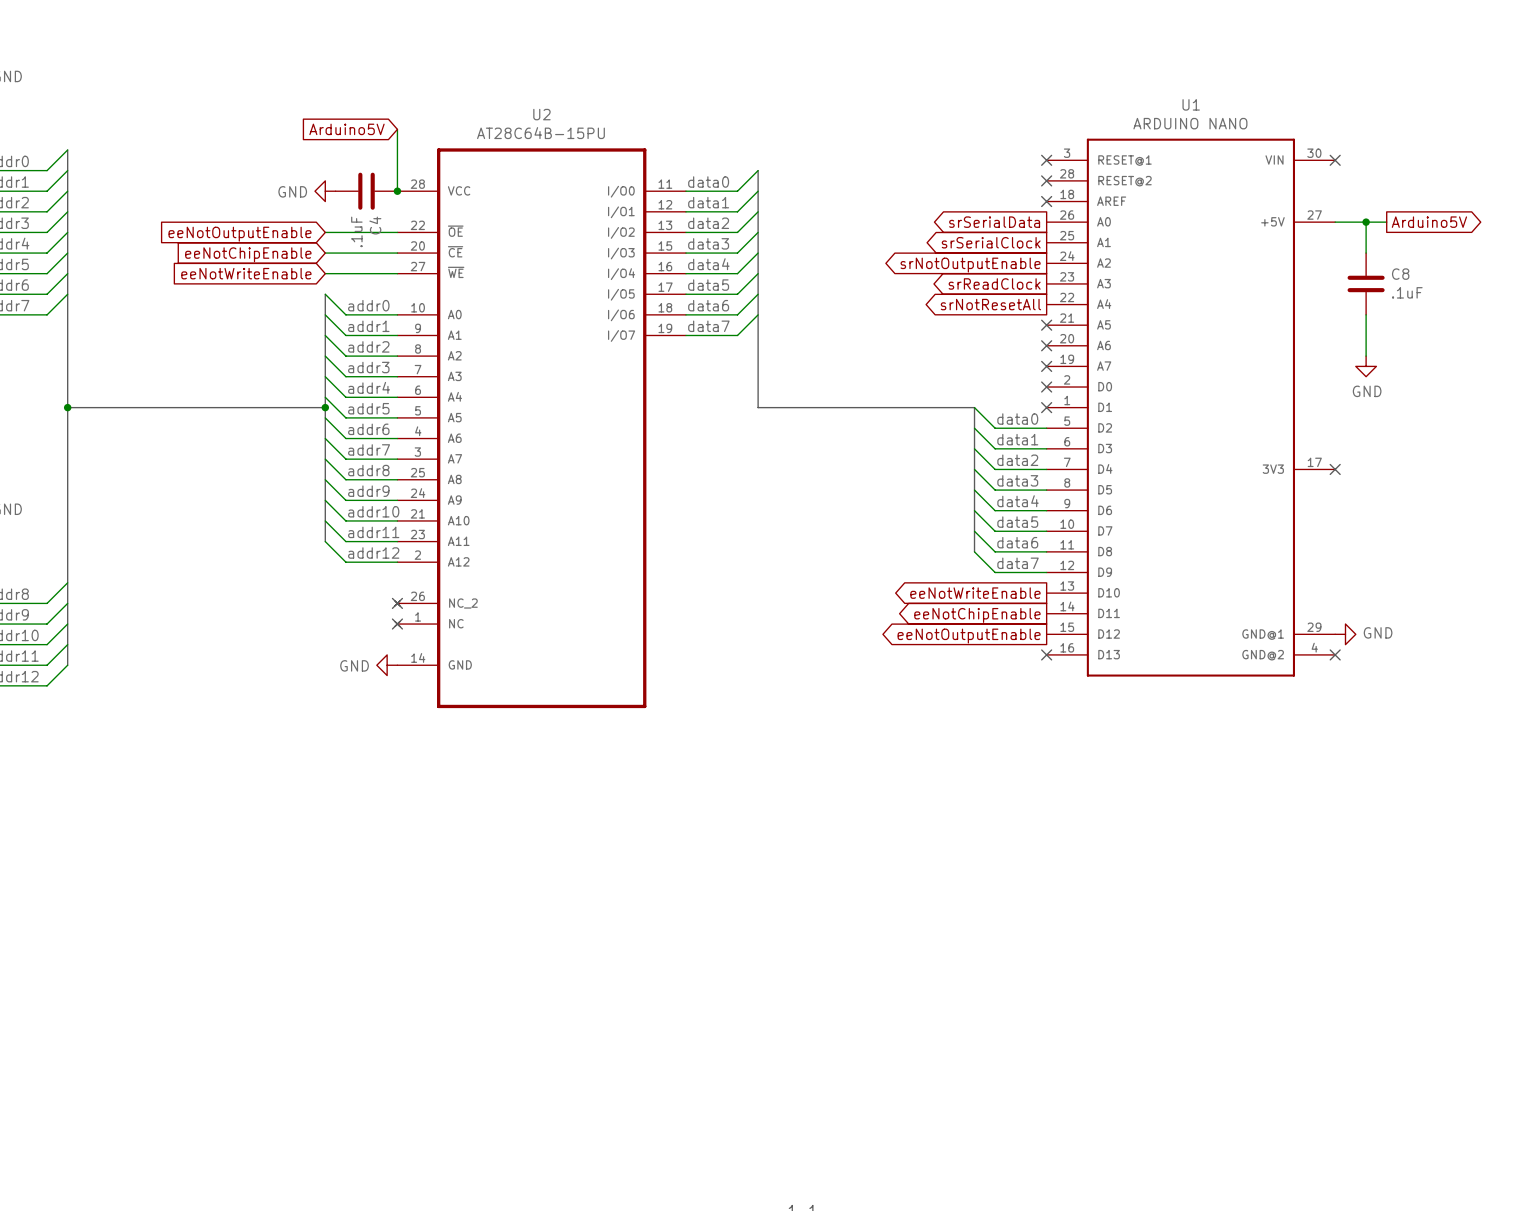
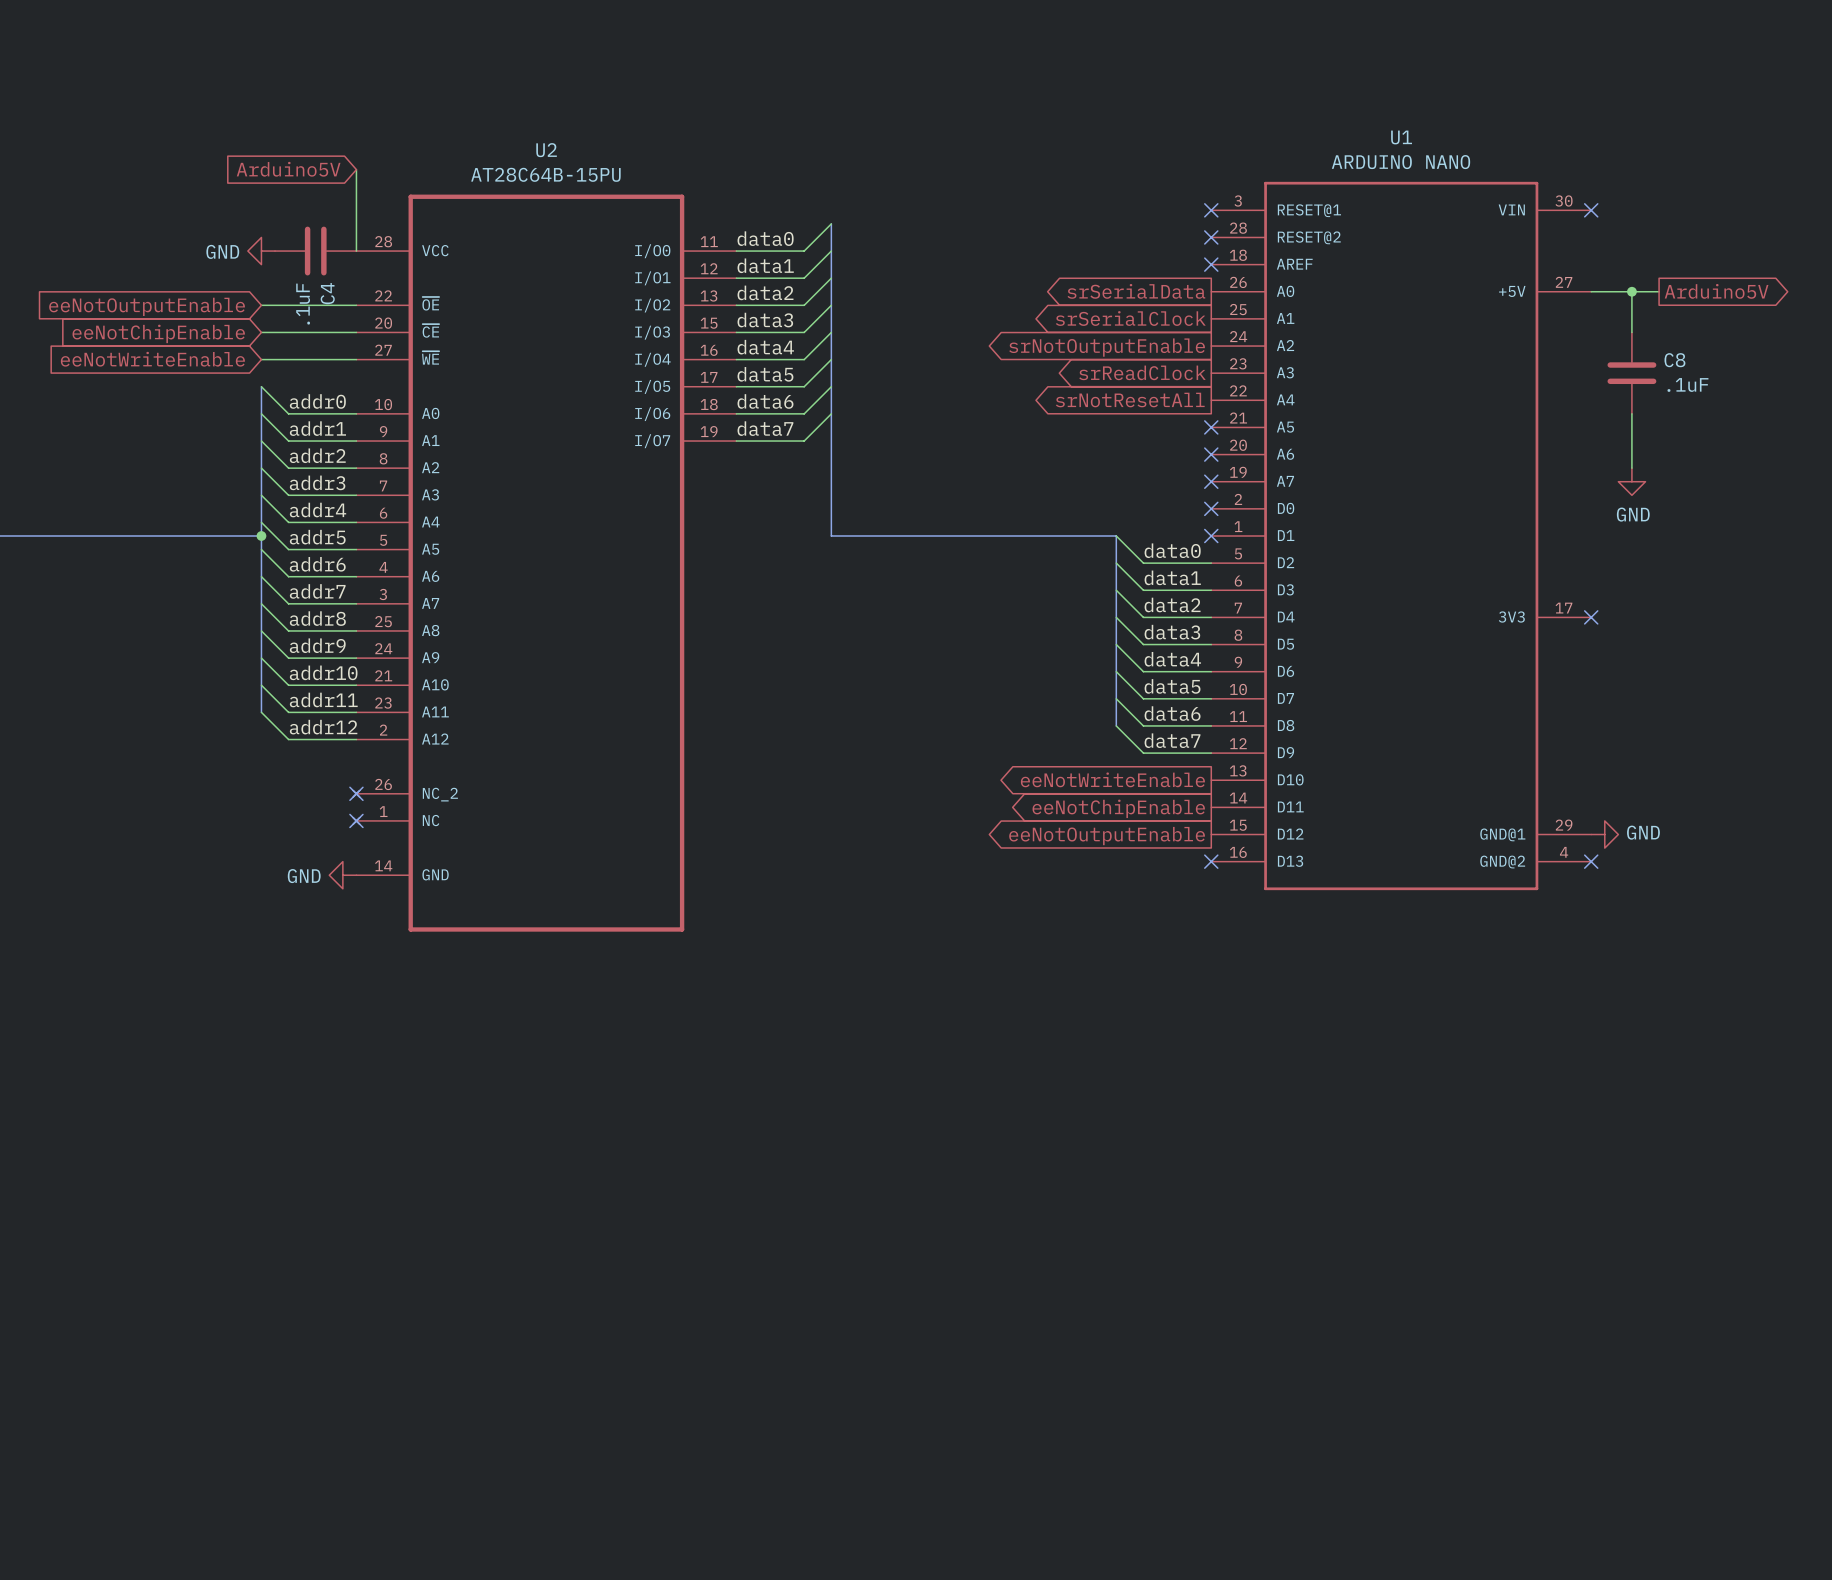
junction: (397, 191) -> none

